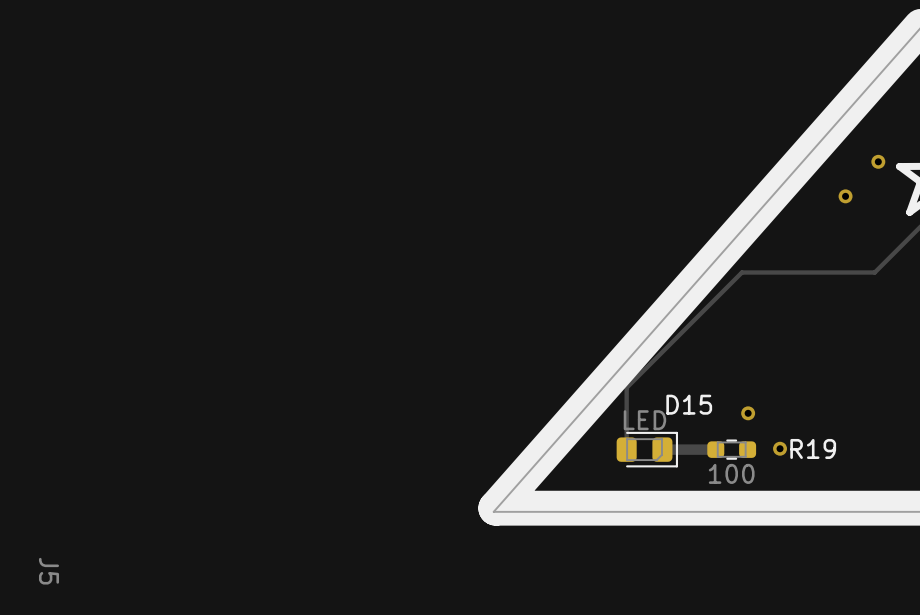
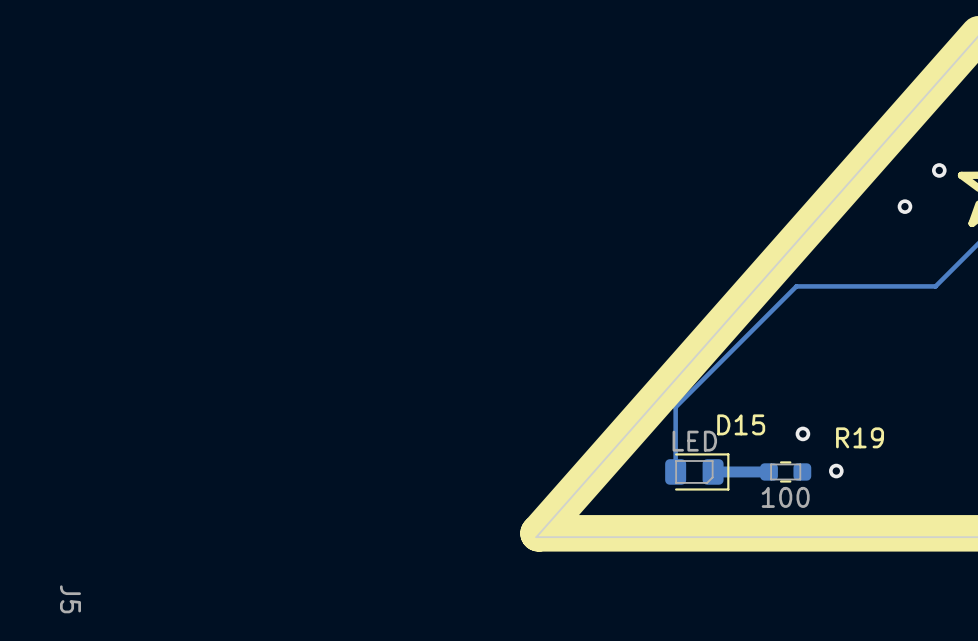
R19 name position: R19 (813, 448) -> R19 (860, 437)

